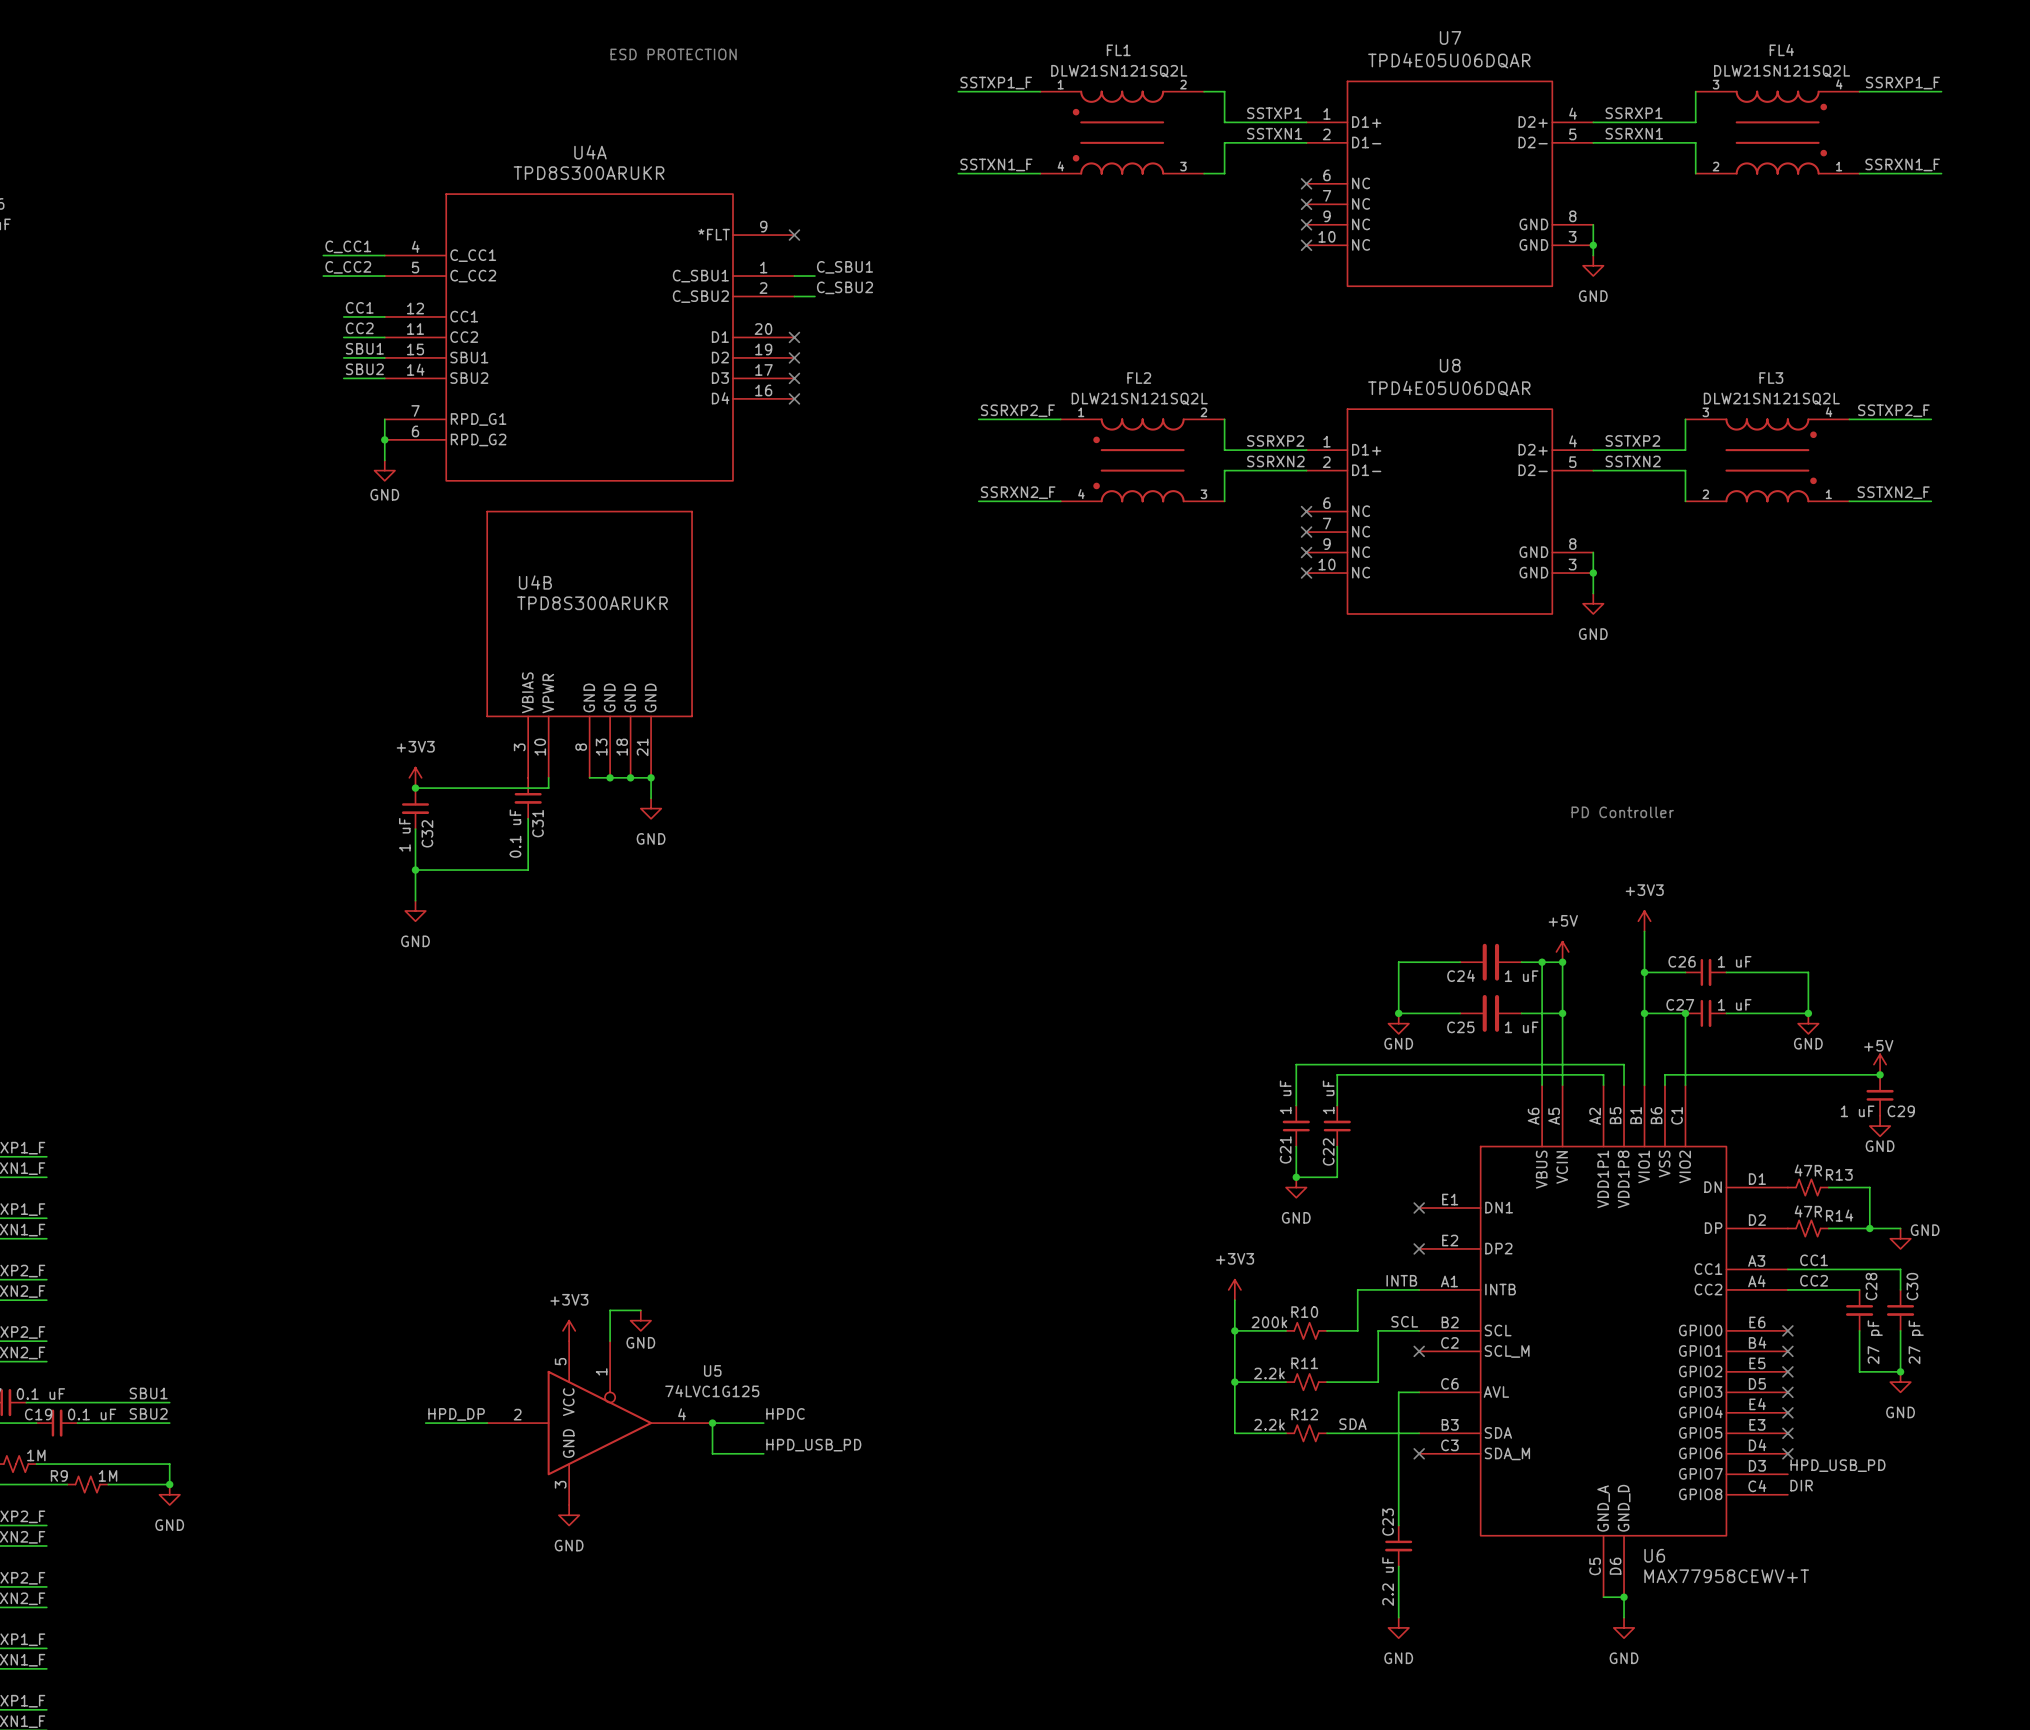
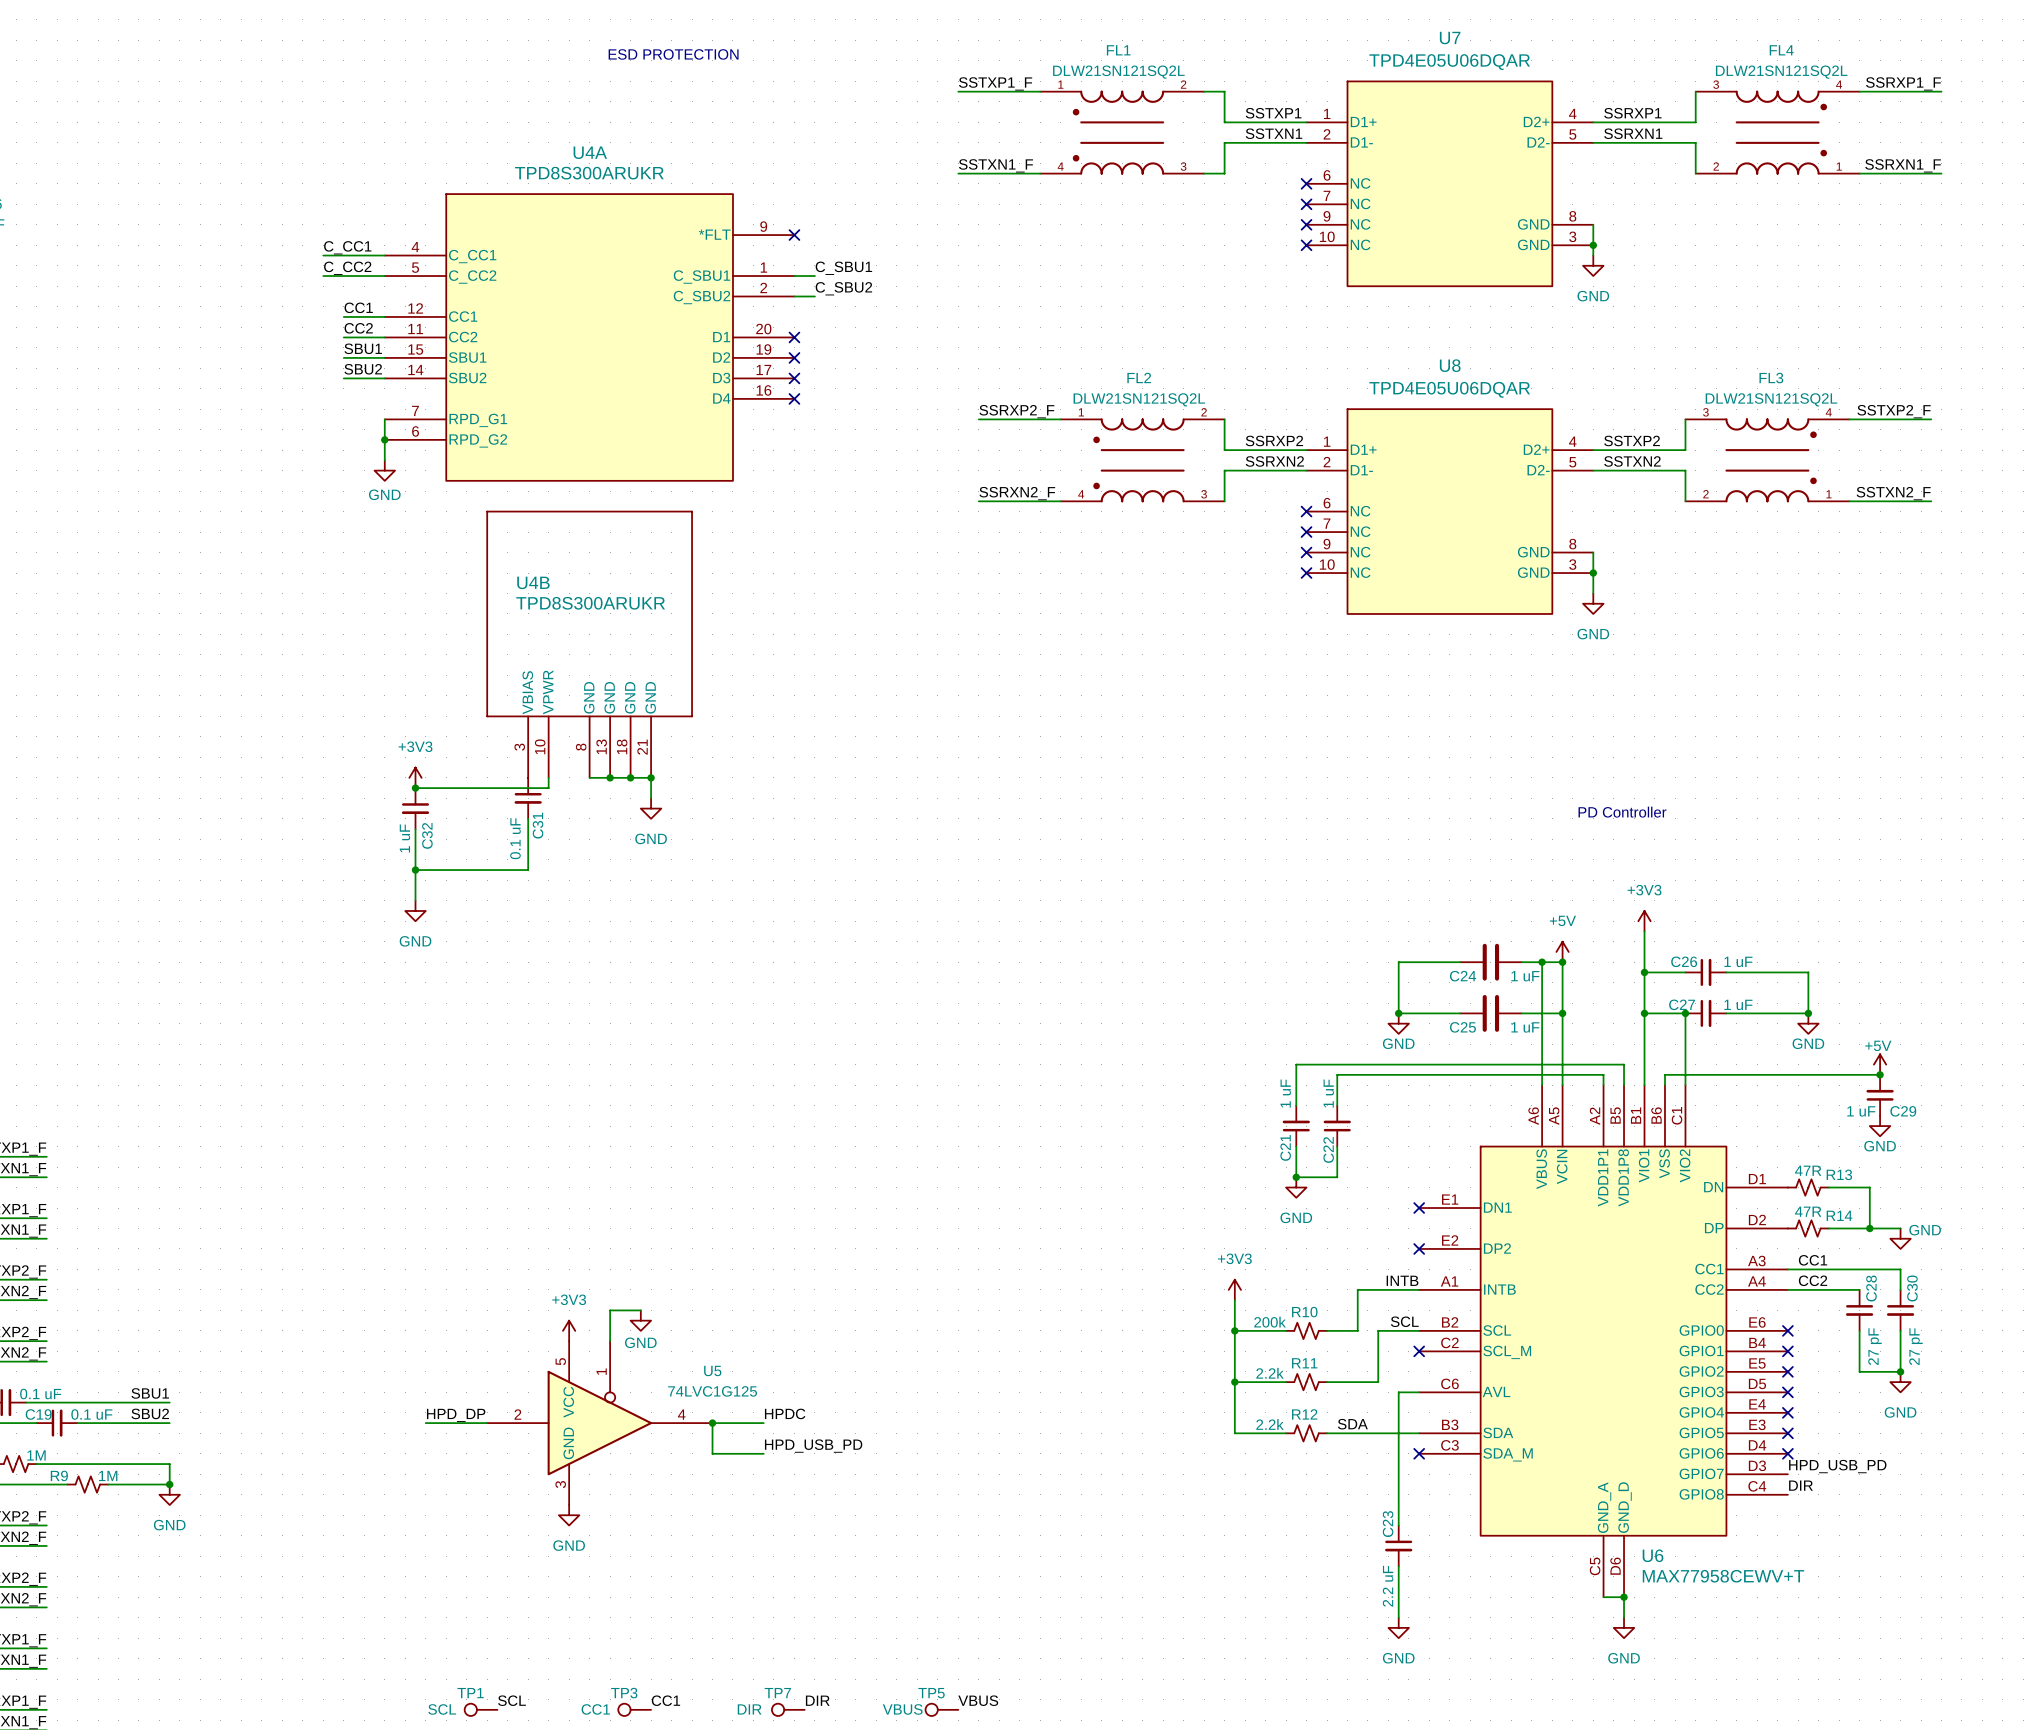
label: none -> SCL (512, 1700)
label: none -> CC1 (665, 1700)
label: none -> DIR (817, 1700)
label: none -> VBUS (978, 1700)
TP1: none -> SCL (481, 1709)
TP3: none -> CC1 (634, 1709)
TP7: none -> DIR (788, 1709)
TP5: none -> VBUS (941, 1709)

